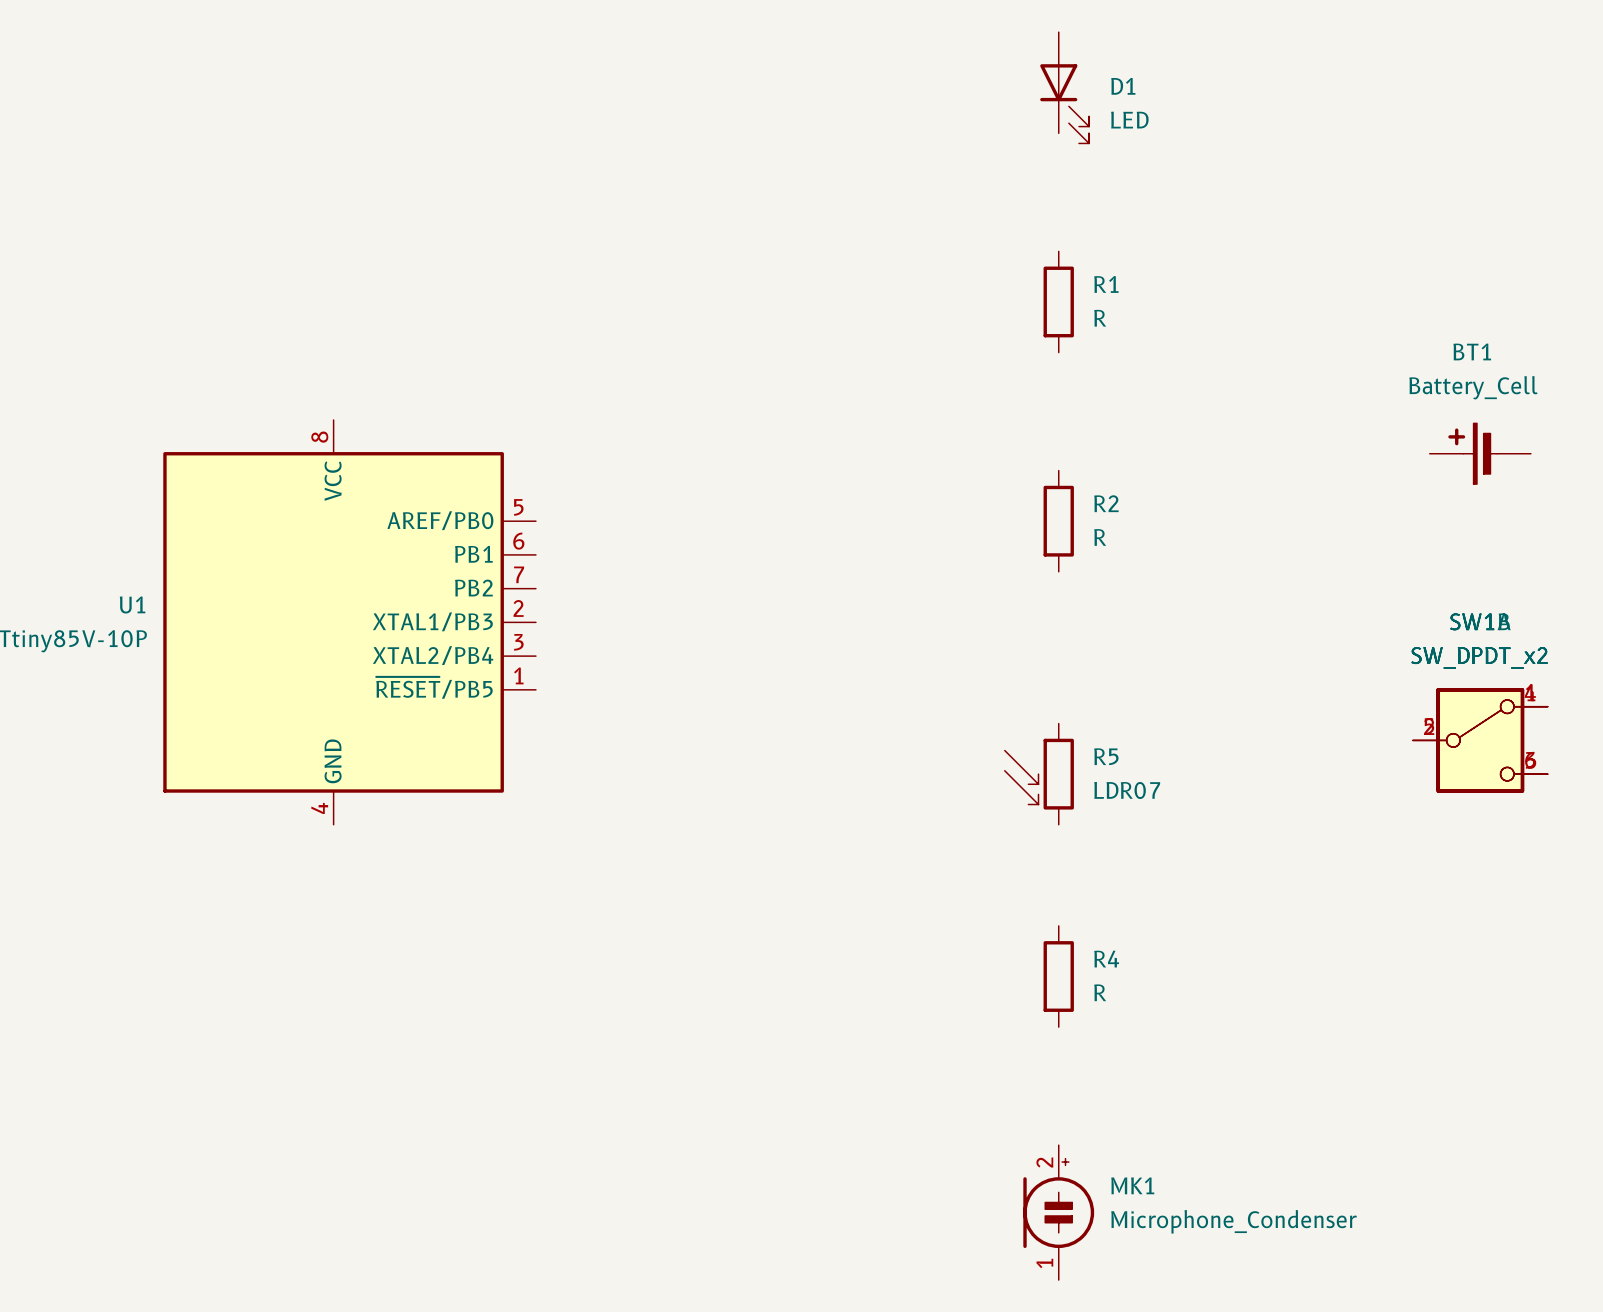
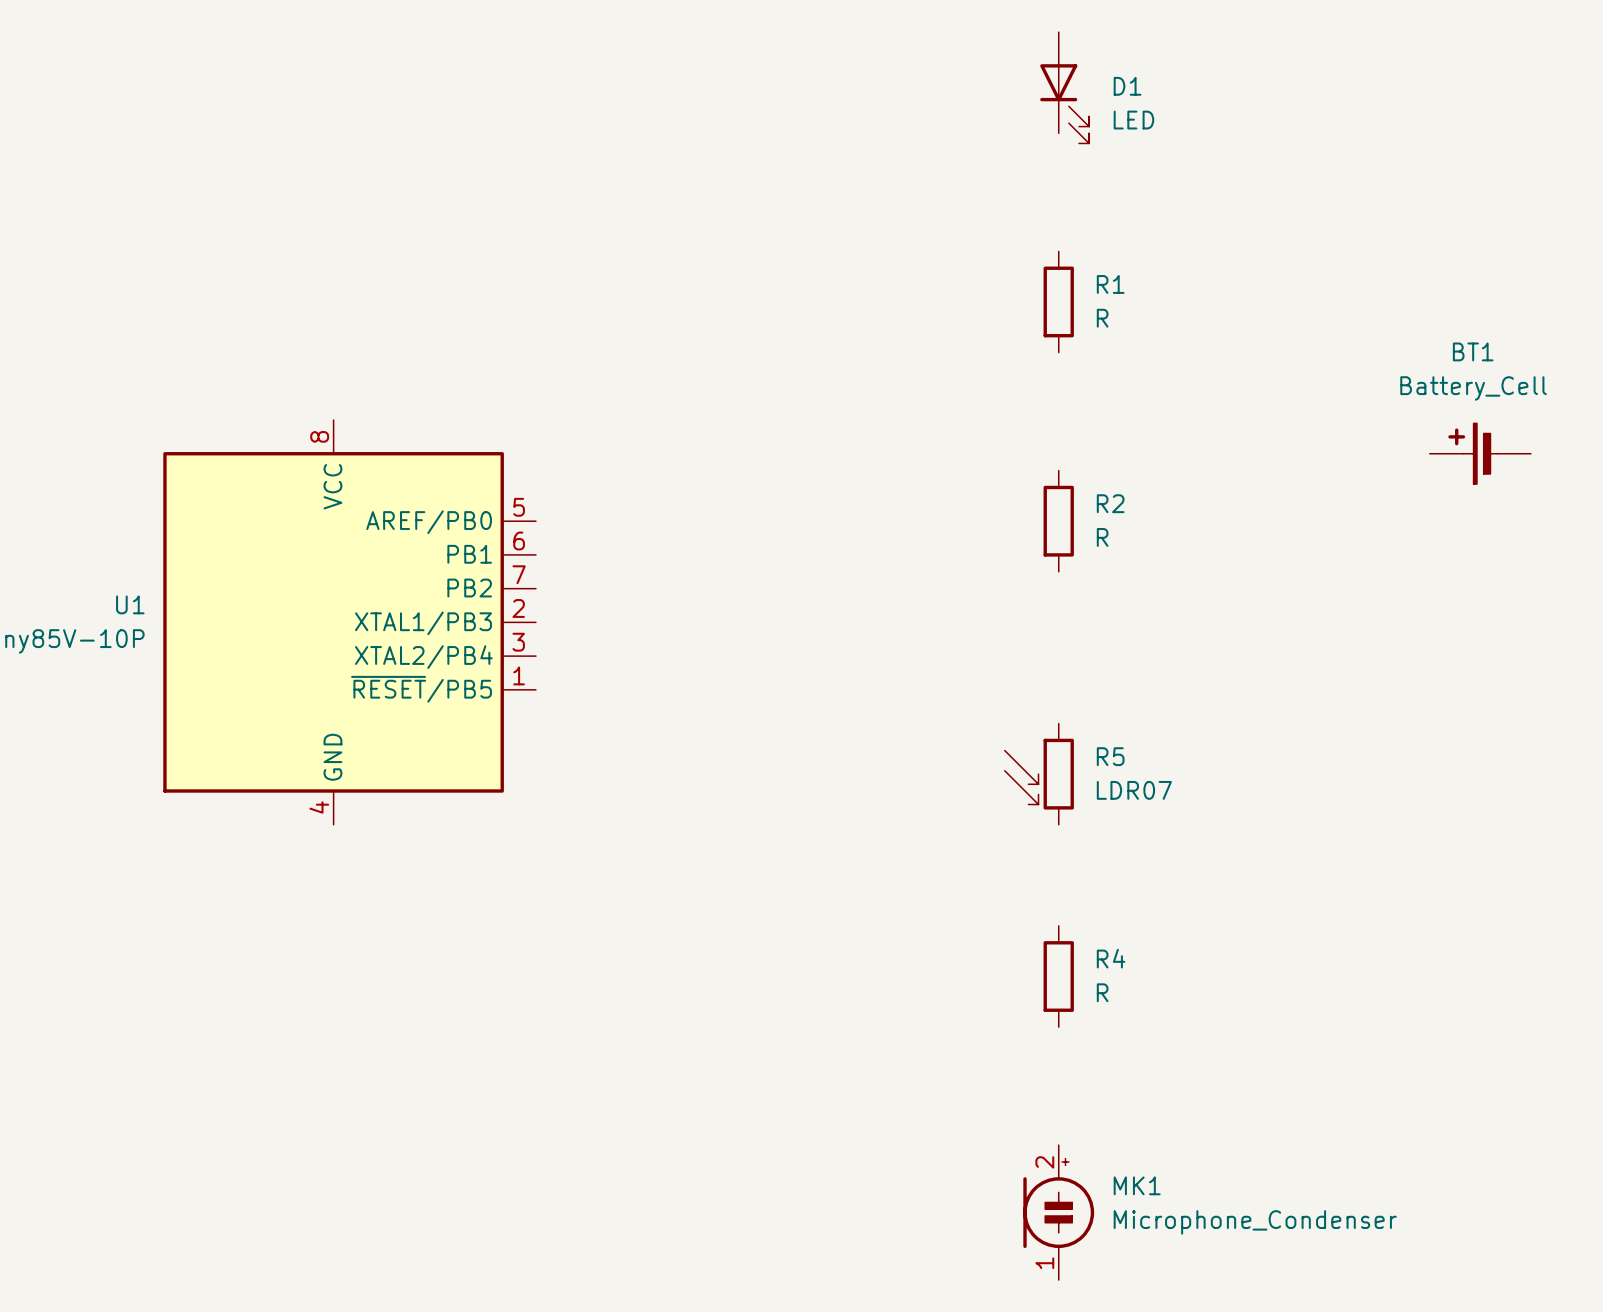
part: SW_DPDT_x2 (1480, 740) -> none
part: SW_DPDT_x2 (1480, 740) -> none

